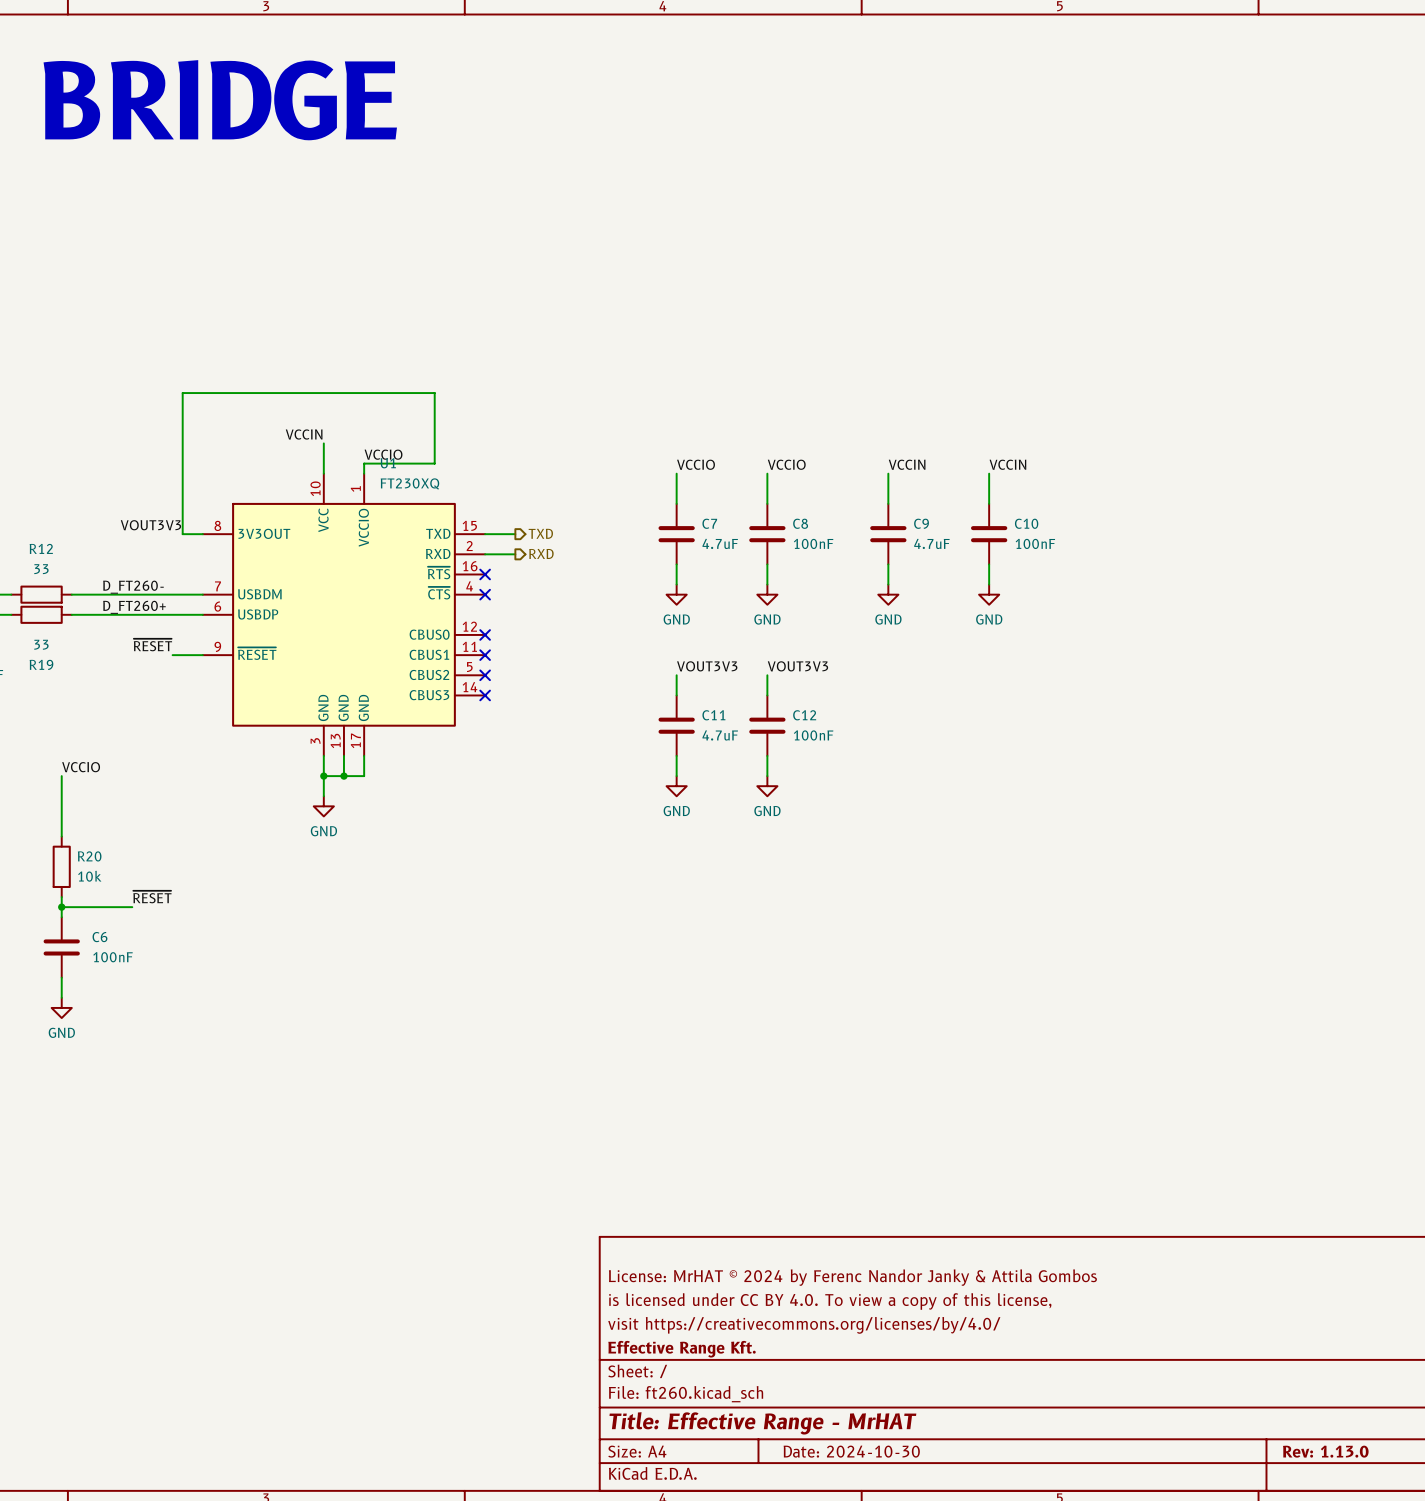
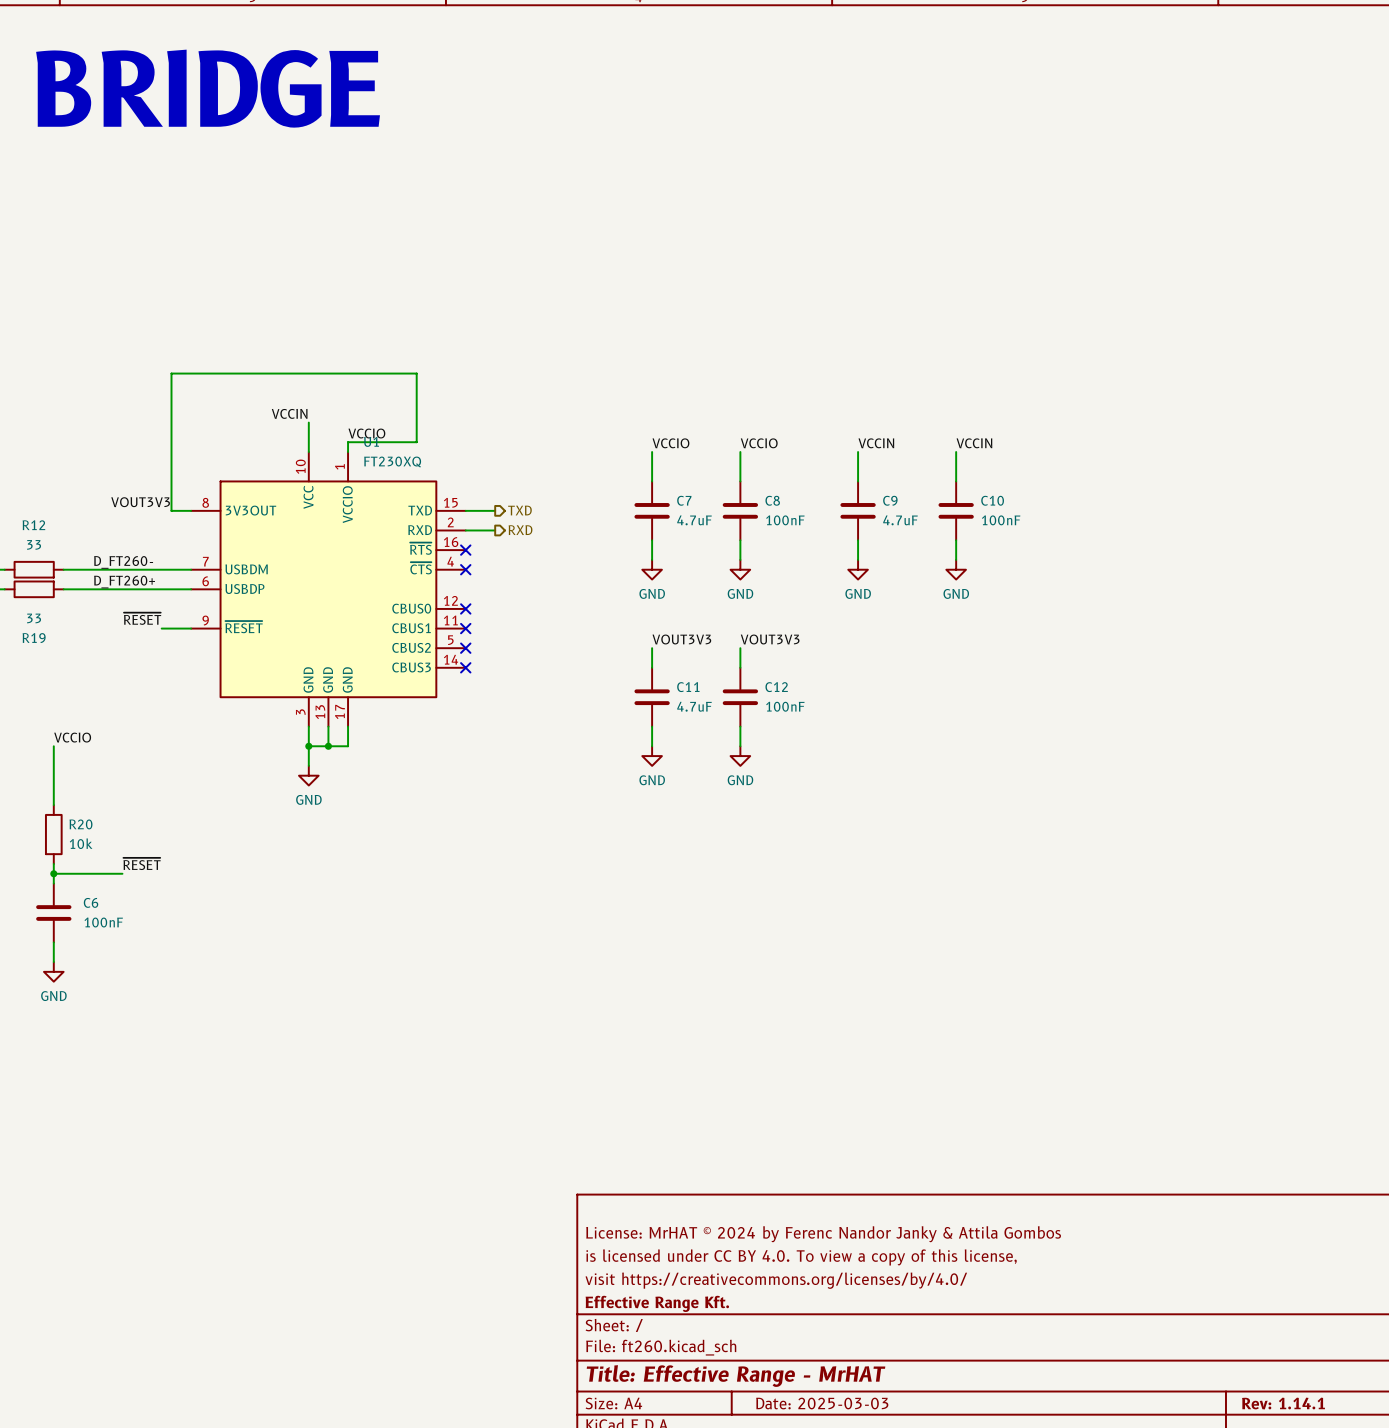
title block: Date: 2024-10-30 (851, 1451) -> Date: 2025-03-03 (822, 1403)
title block: Rev: 1.13.0 (1325, 1451) -> Rev: 1.14.1 (1283, 1403)

